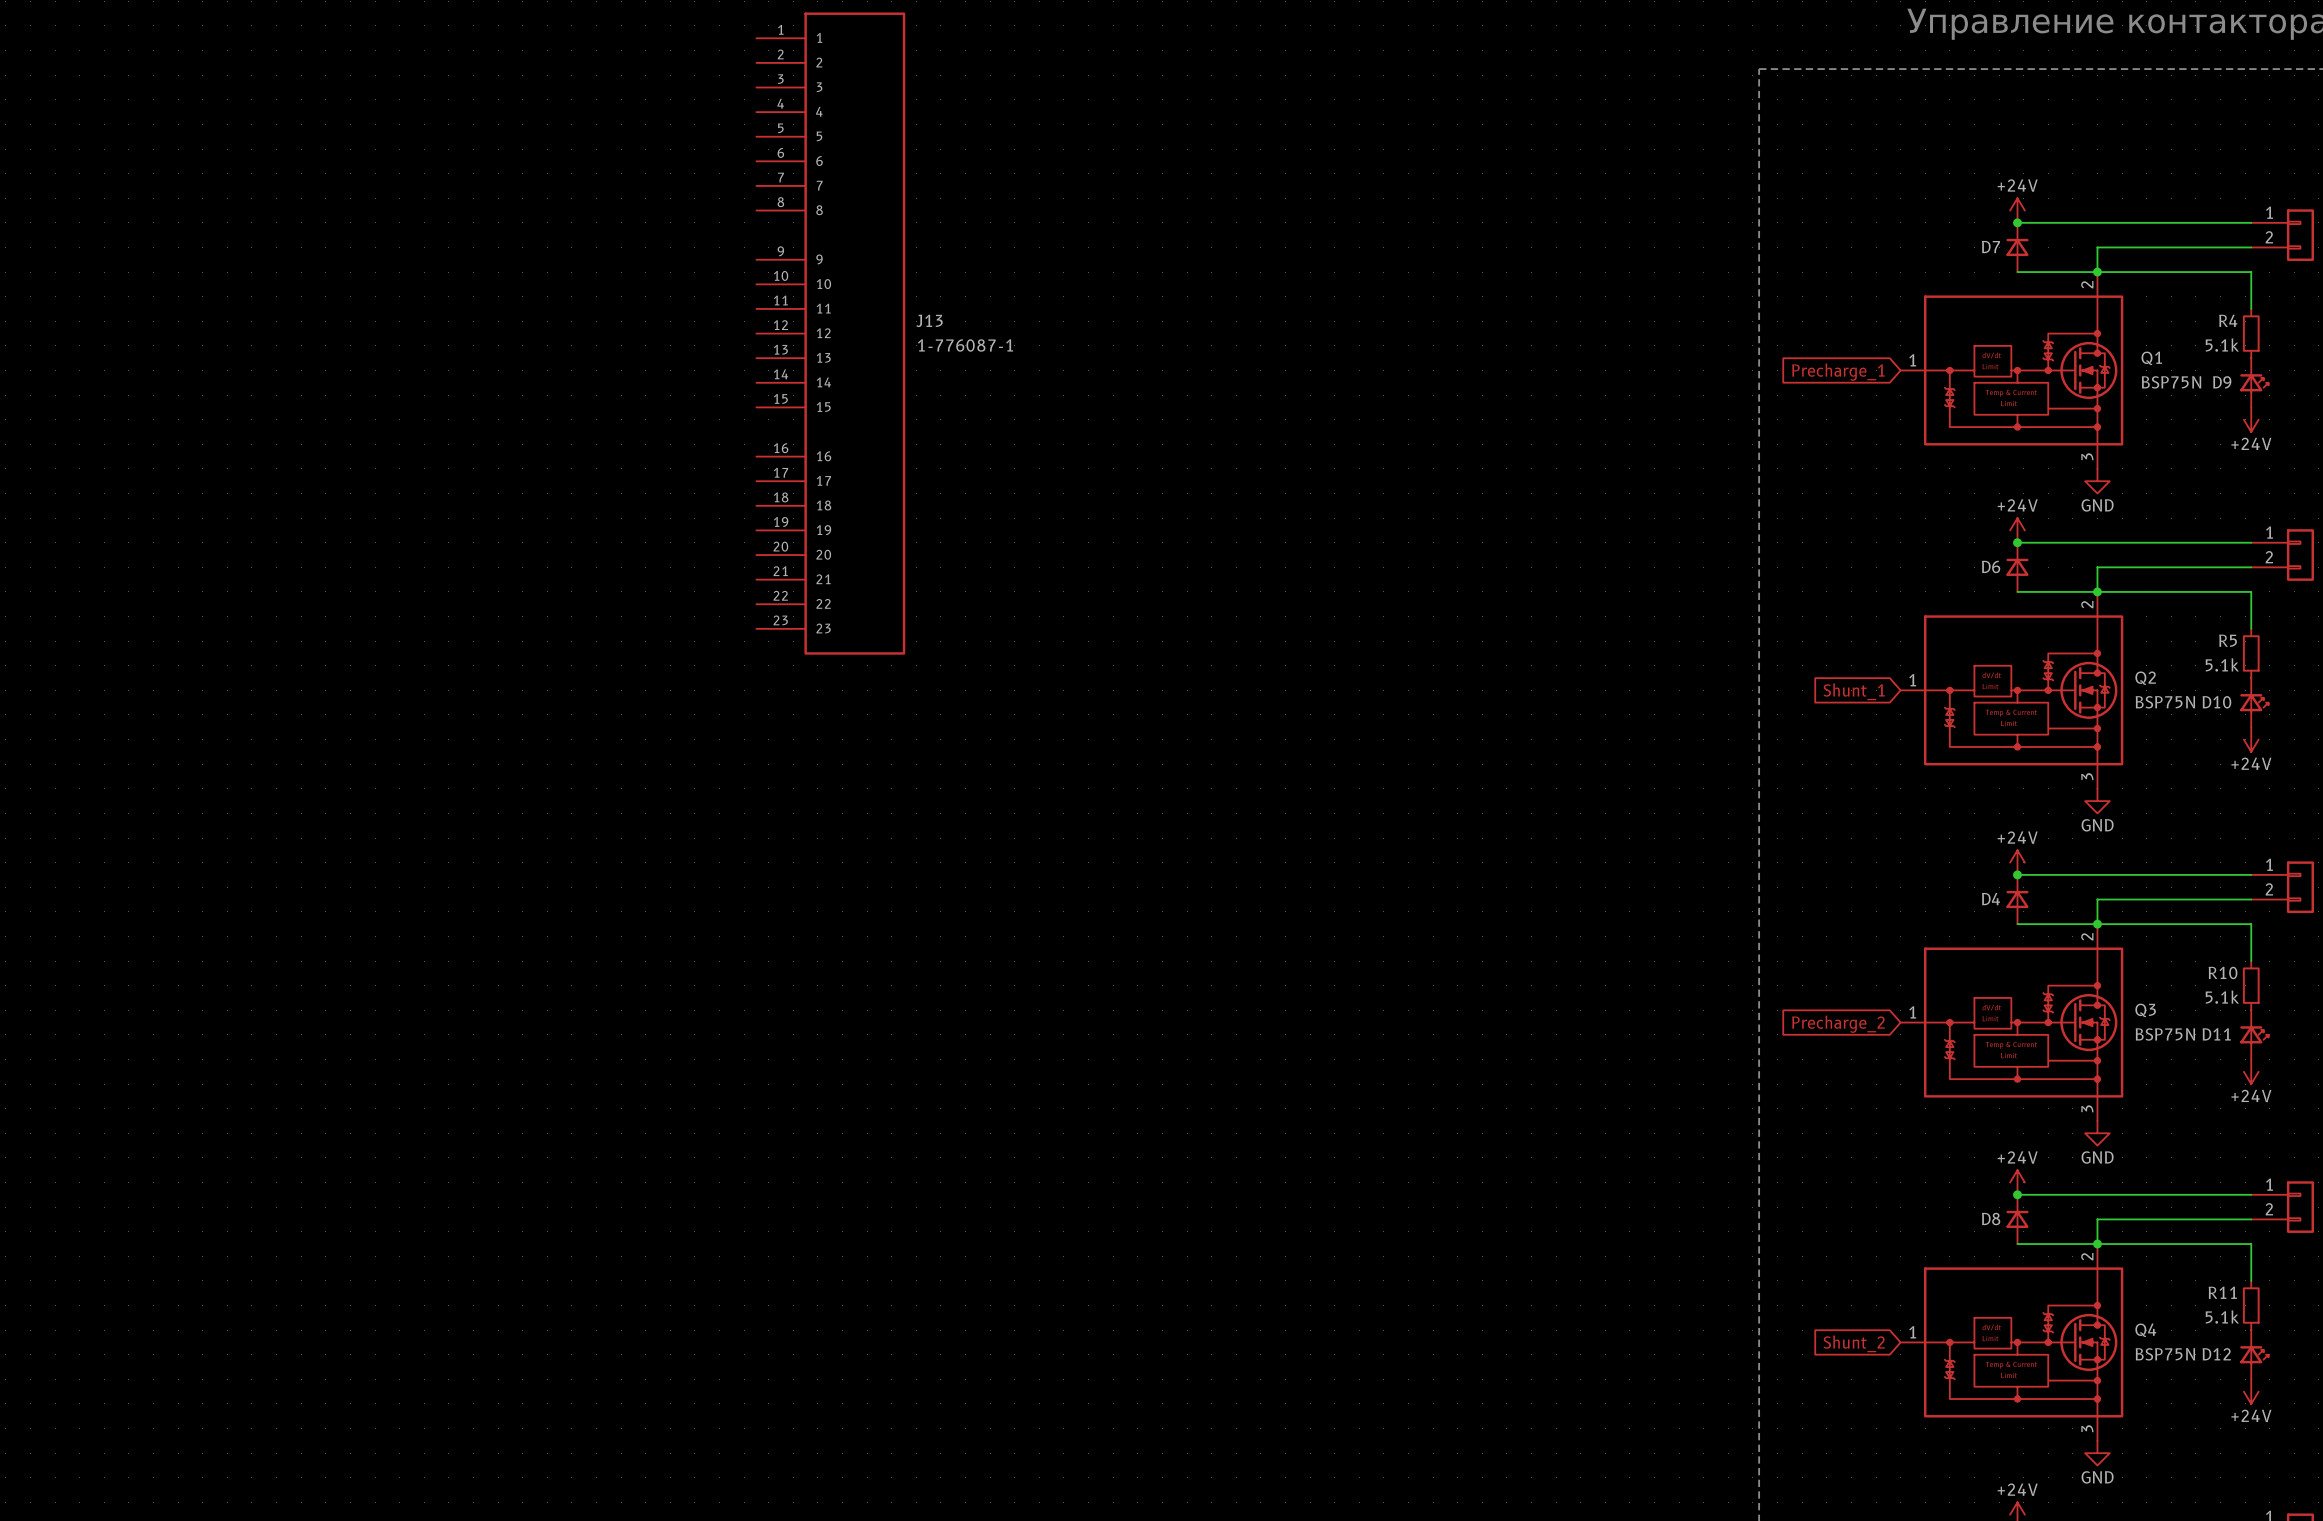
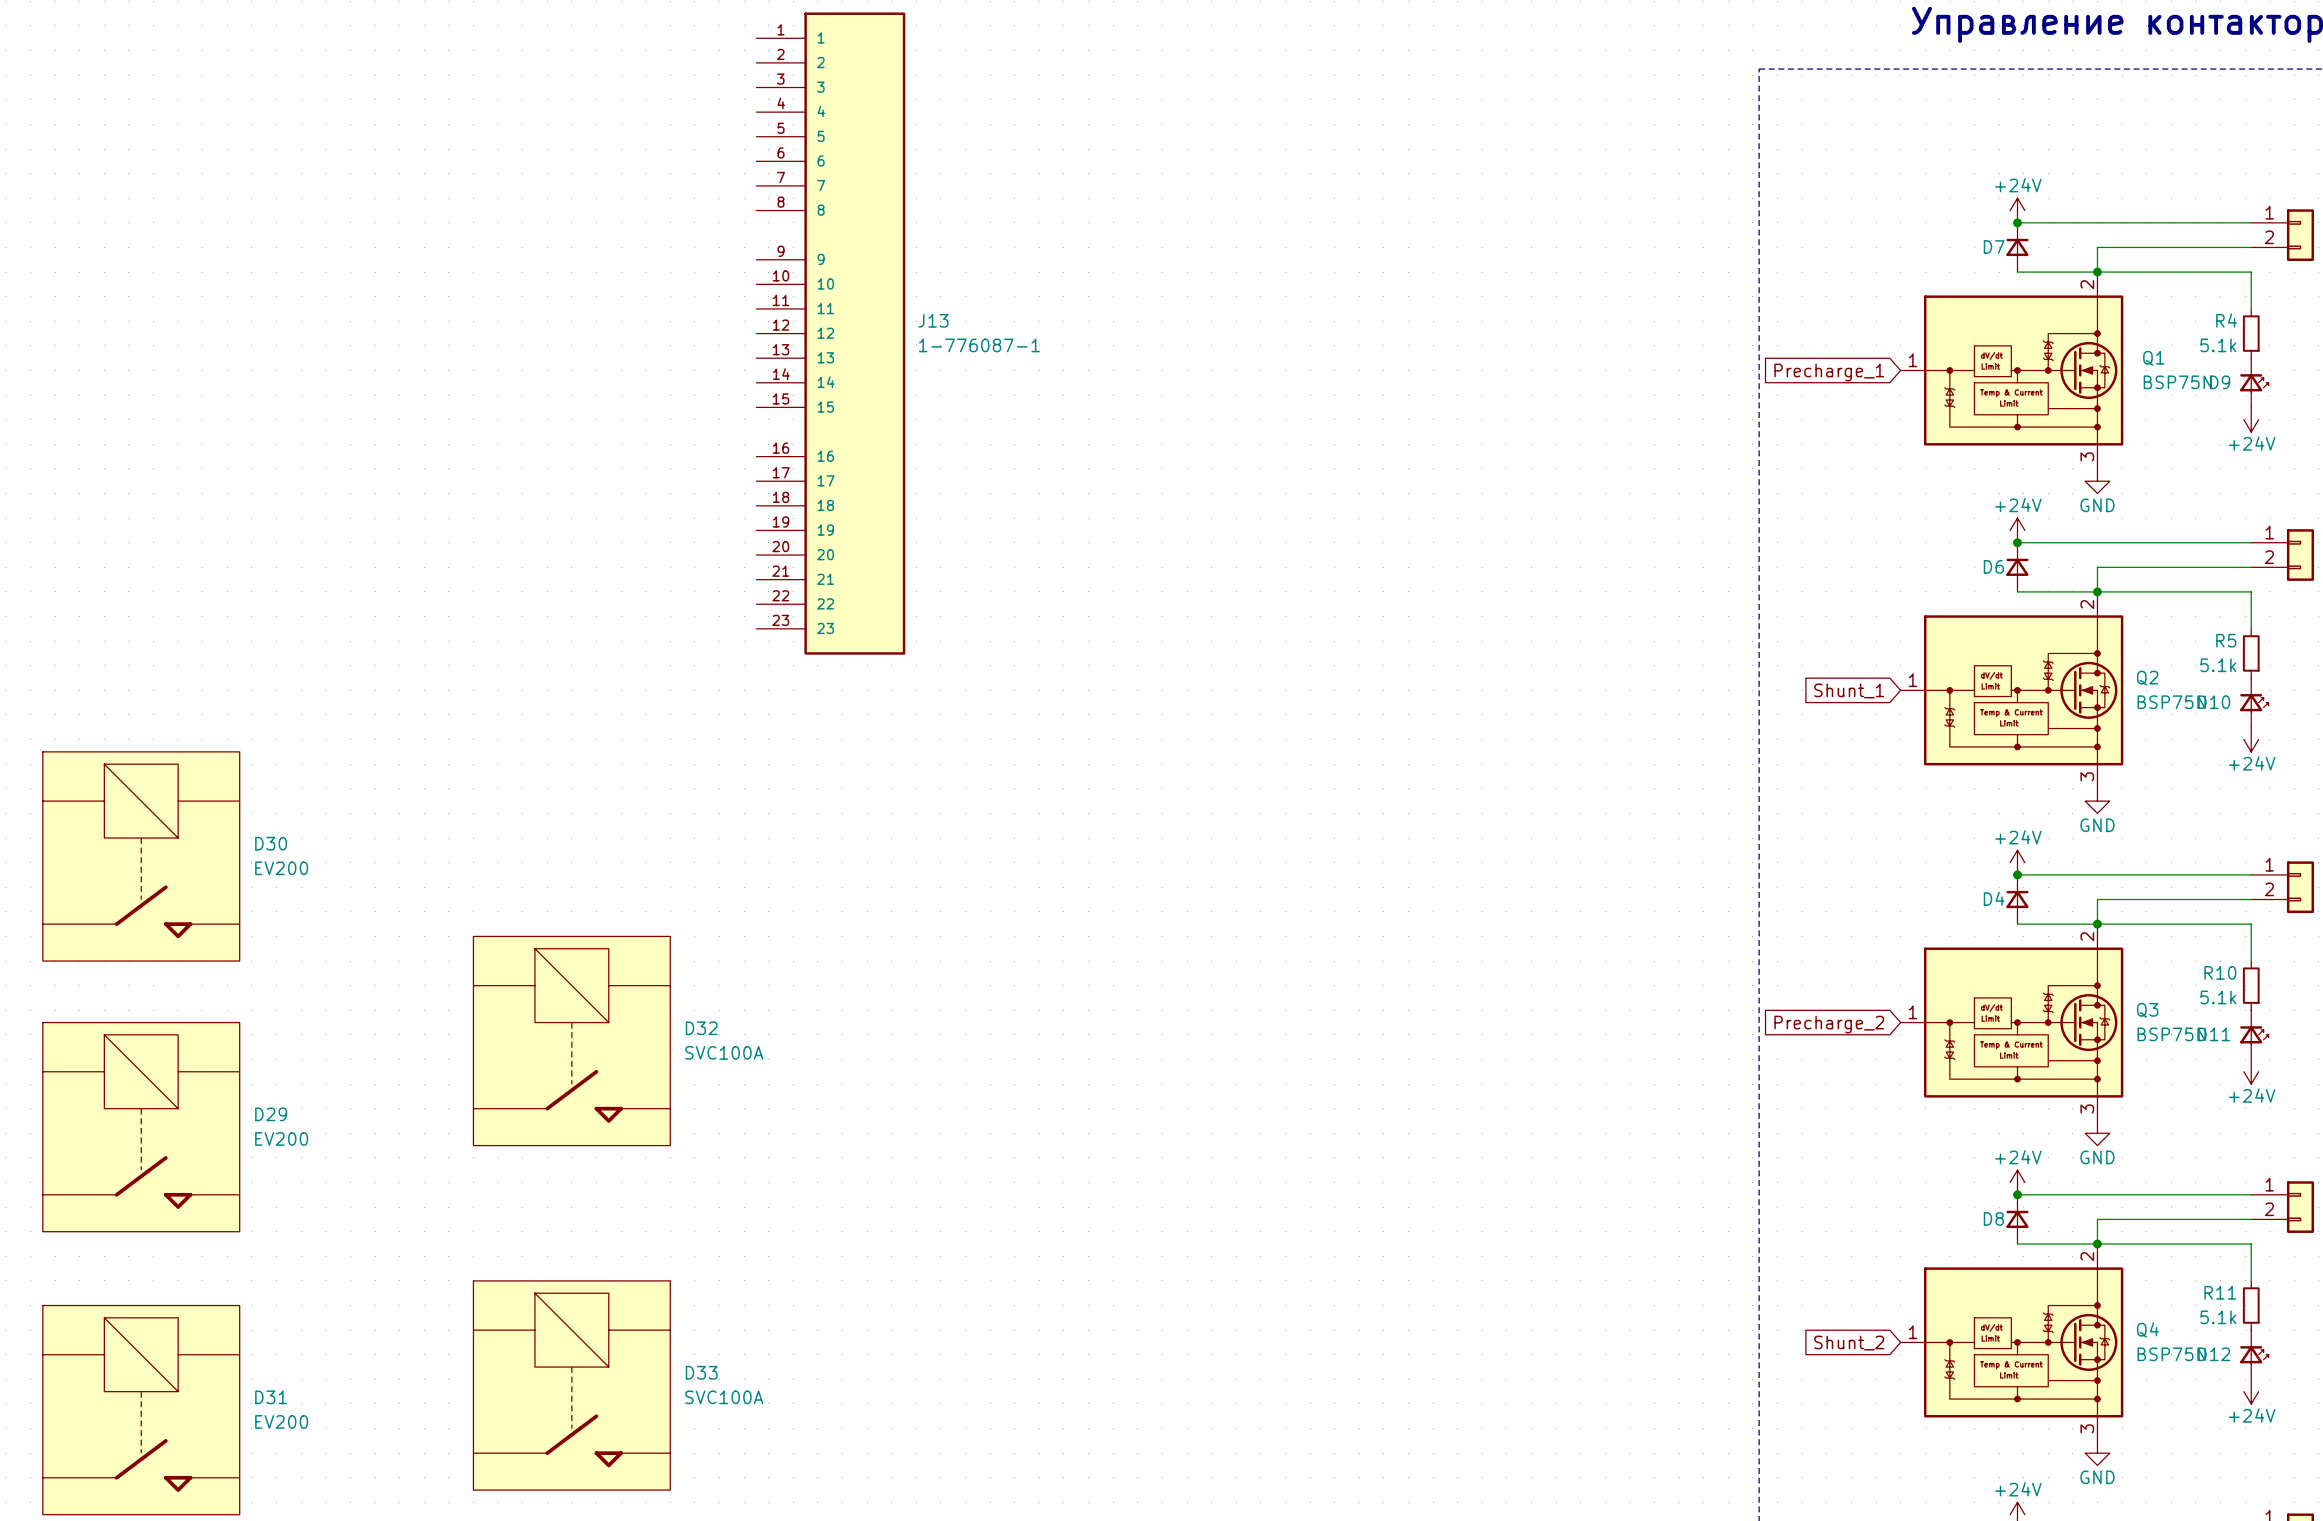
D30: none -> EV200 (141, 856)
D32: none -> SVC100A (571, 1041)
D29: none -> EV200 (141, 1127)
D33: none -> SVC100A (571, 1385)
D31: none -> EV200 (141, 1410)

